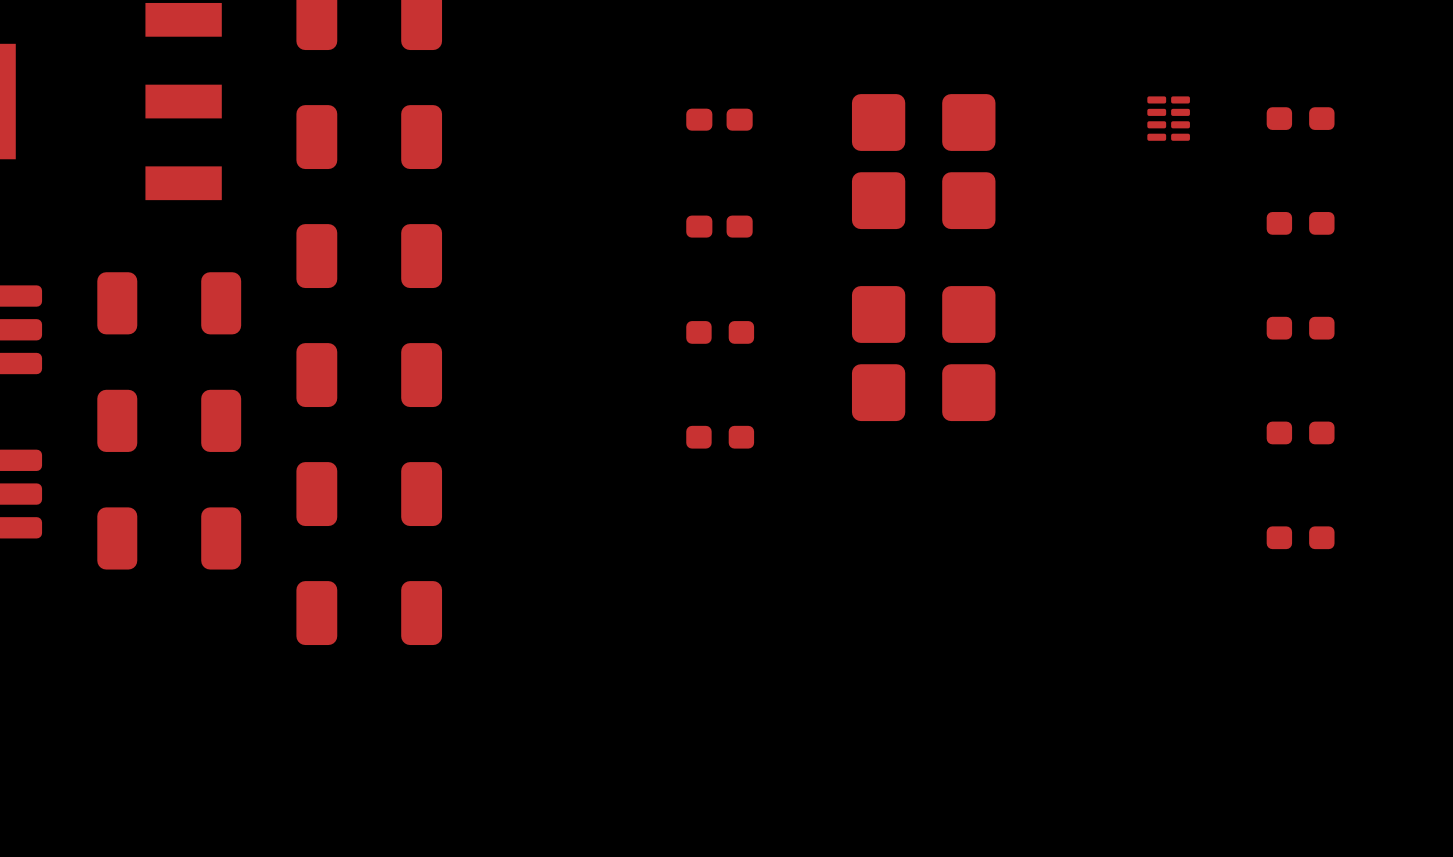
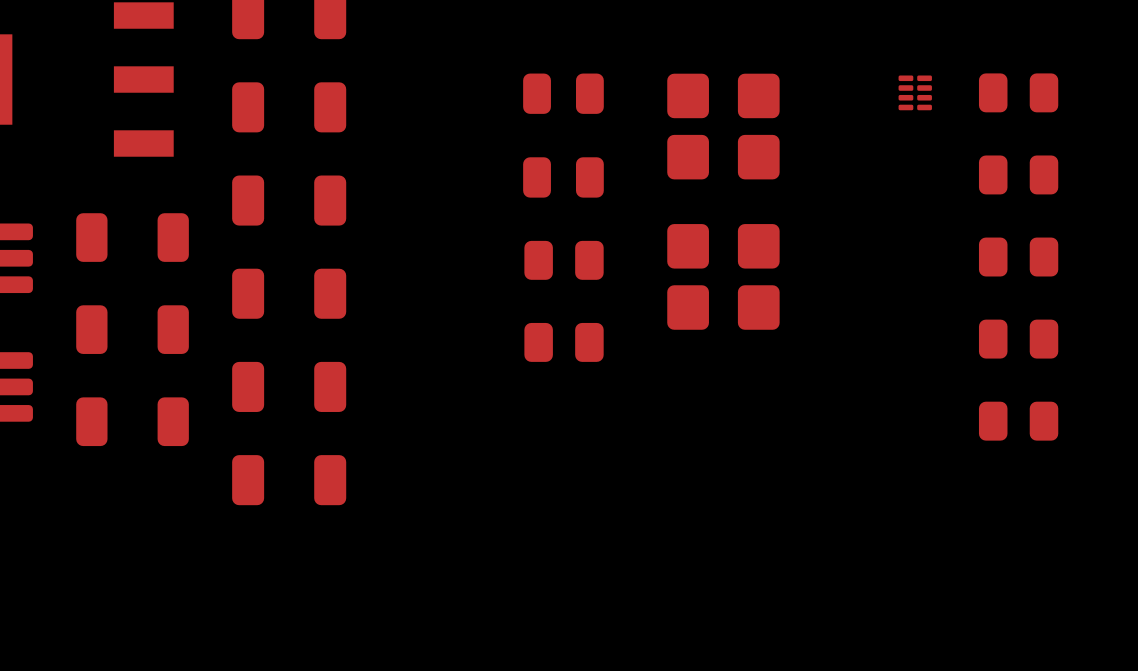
part footprint: [1266, 107, 1335, 130] -> [978, 73, 1059, 113]
part footprint: [686, 108, 753, 131] -> [523, 73, 604, 114]
part footprint: [1266, 212, 1335, 235] -> [978, 155, 1059, 195]
part footprint: [686, 215, 753, 238] -> [523, 157, 604, 198]
part footprint: [1266, 316, 1335, 340] -> [978, 237, 1059, 277]
part footprint: [686, 321, 755, 344] -> [524, 240, 604, 280]
part footprint: [1266, 421, 1335, 445] -> [978, 319, 1059, 359]
part footprint: [686, 425, 755, 449] -> [524, 322, 604, 362]
part footprint: [1266, 526, 1335, 550] -> [978, 401, 1059, 441]

